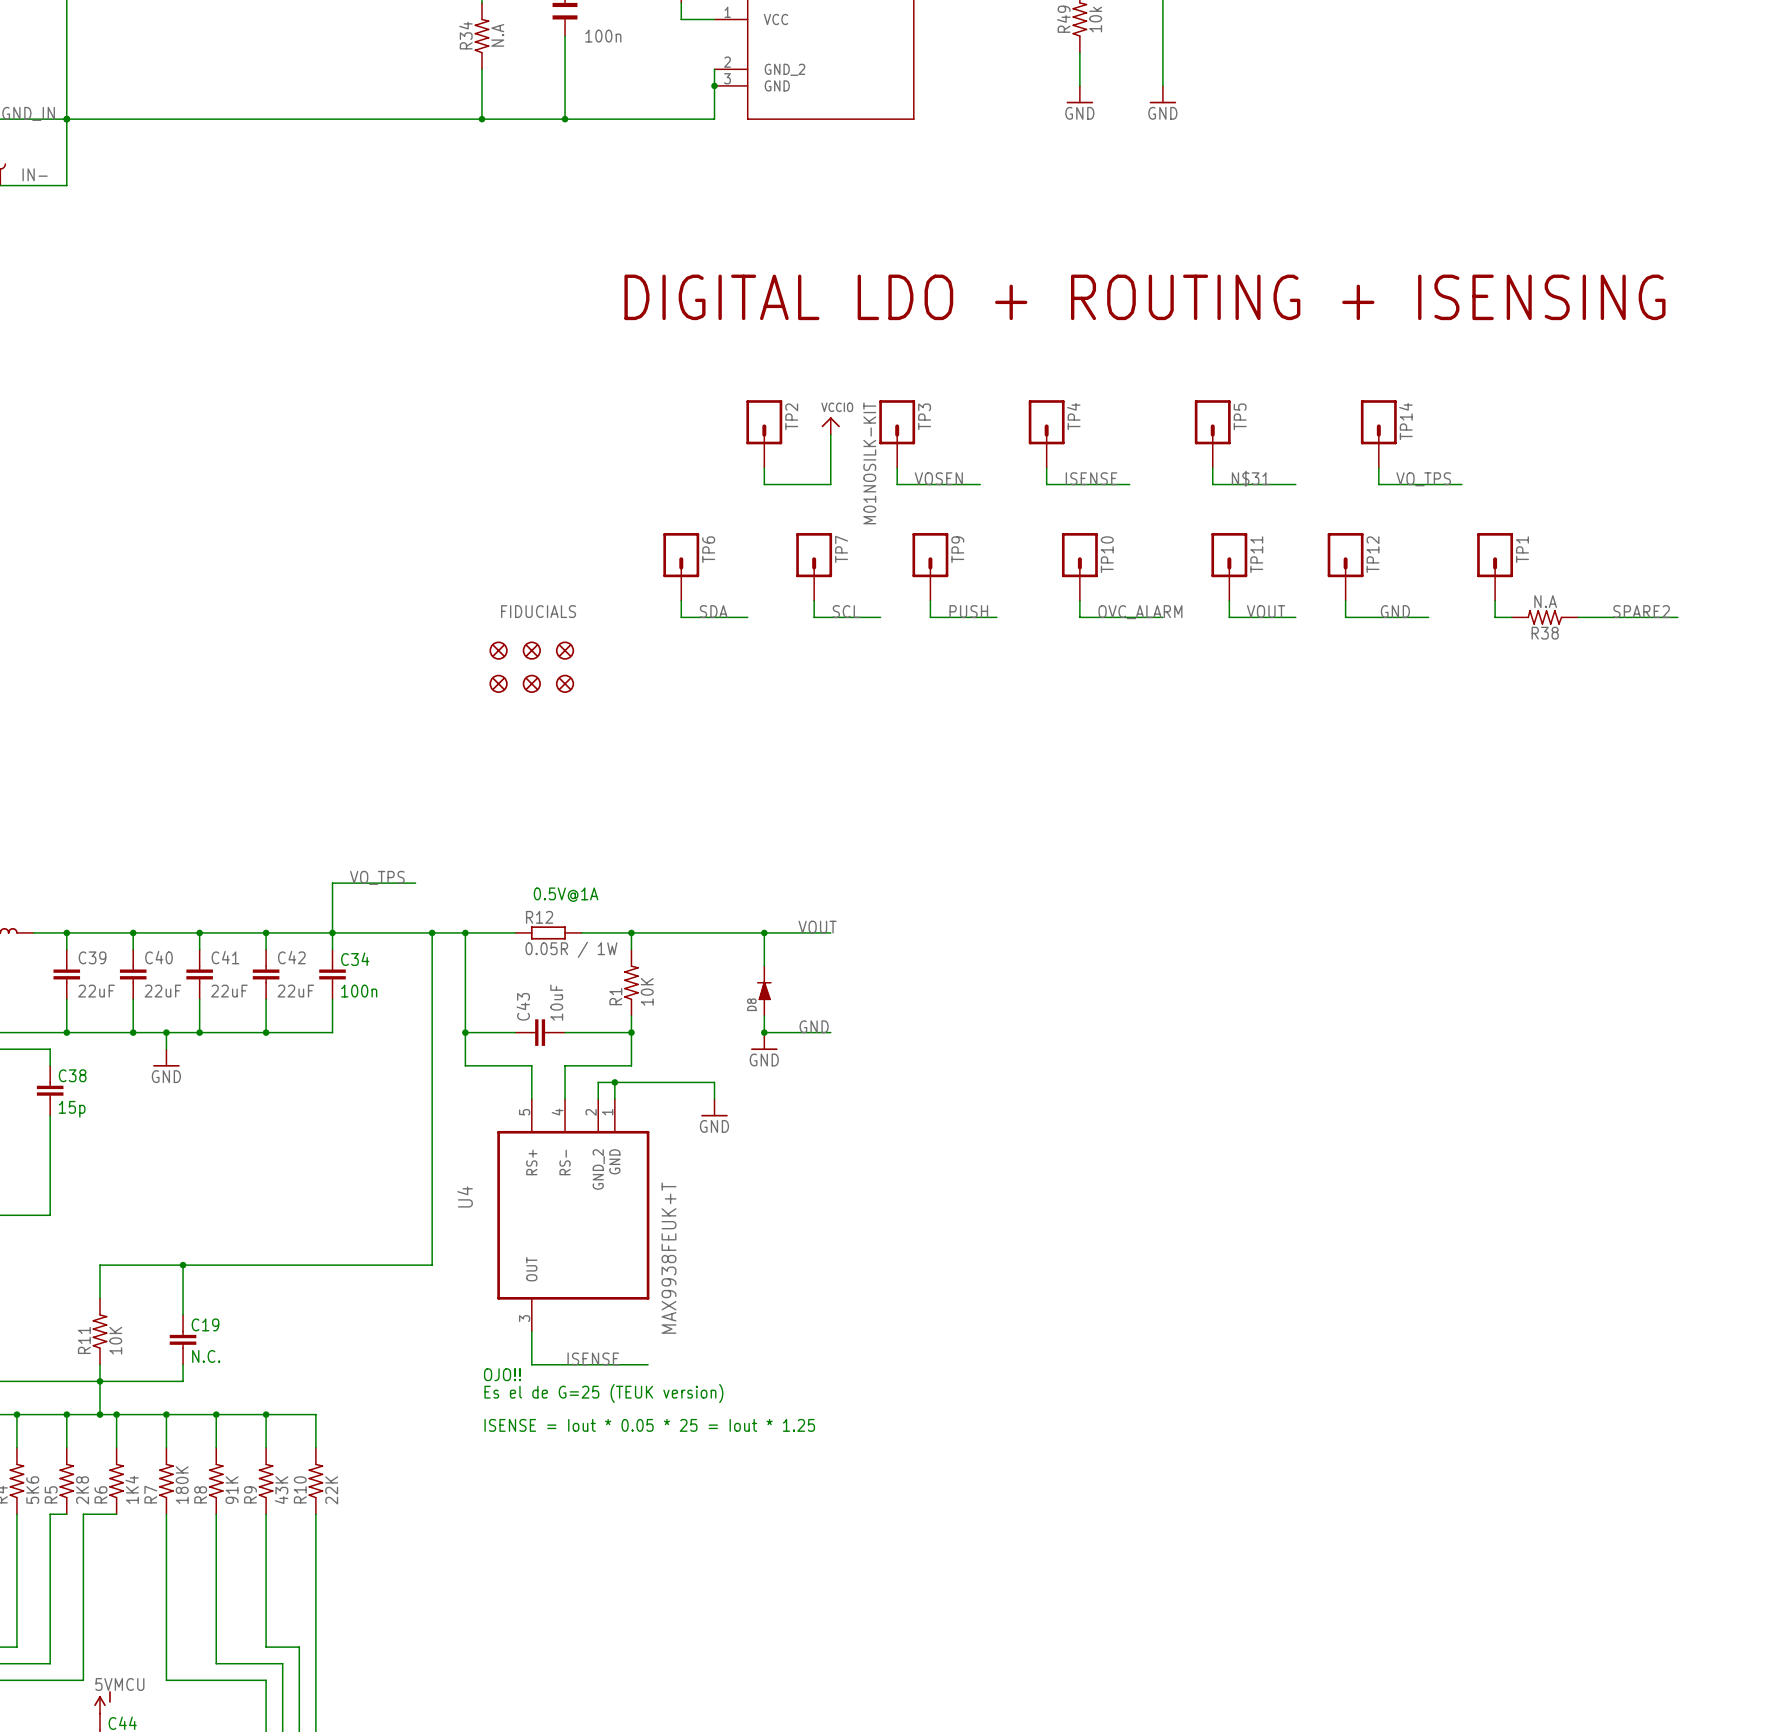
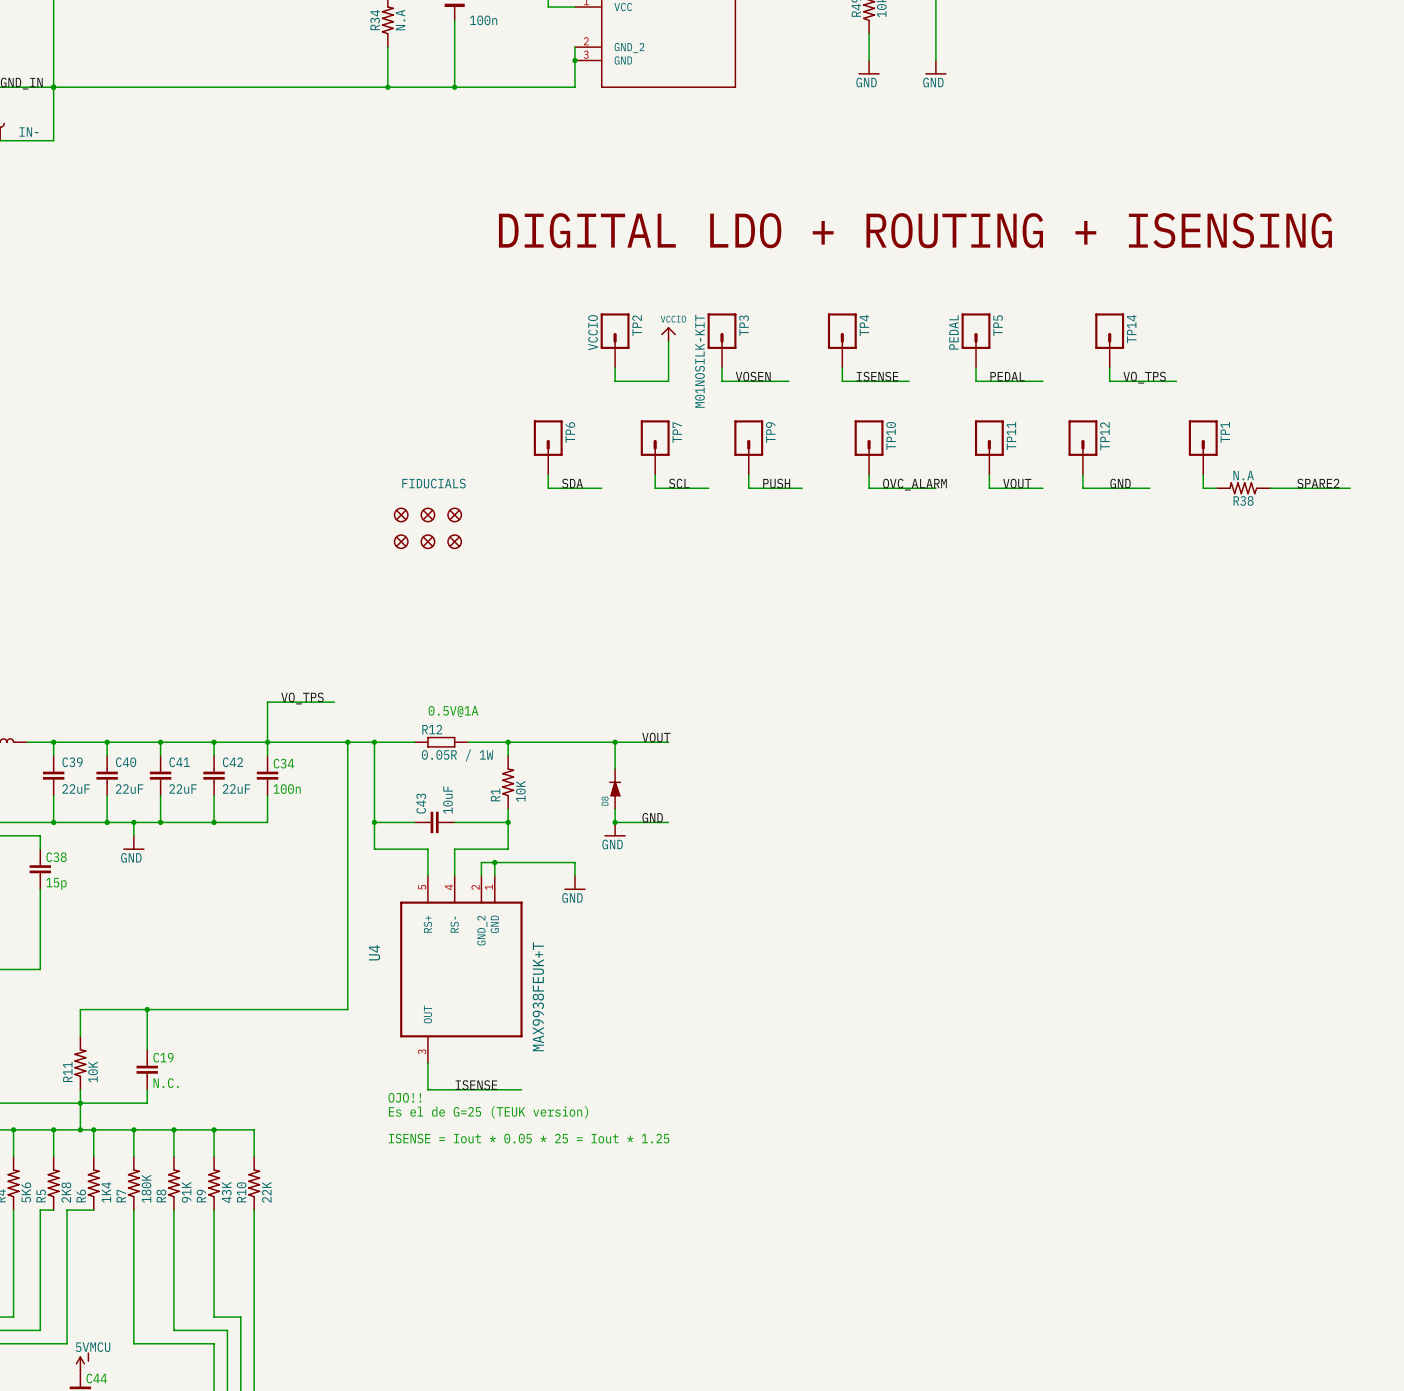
TP2 value: none -> VCCIO (593, 332)
TP5 value: none -> PEDAL (953, 332)
label: N$31 (1250, 478) -> PEDAL (1007, 376)

